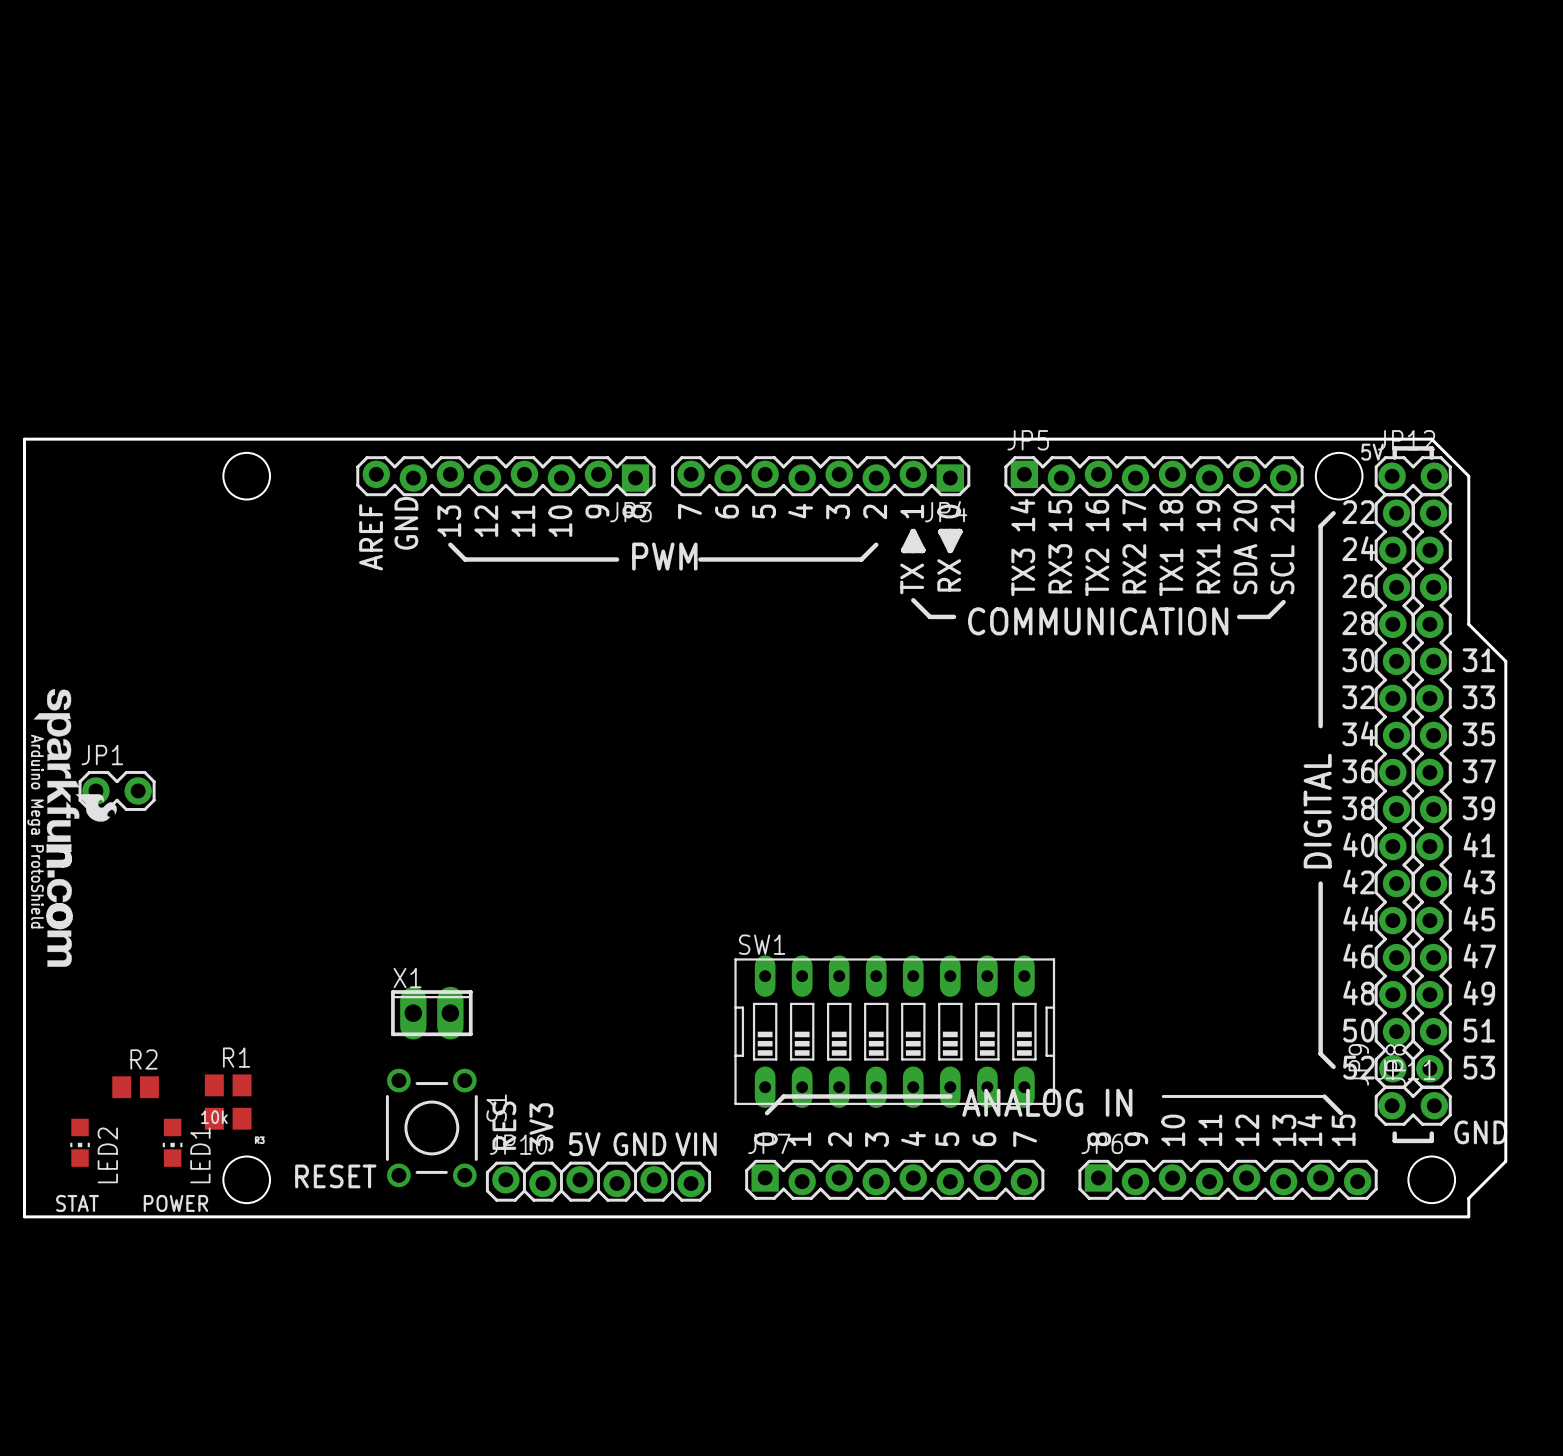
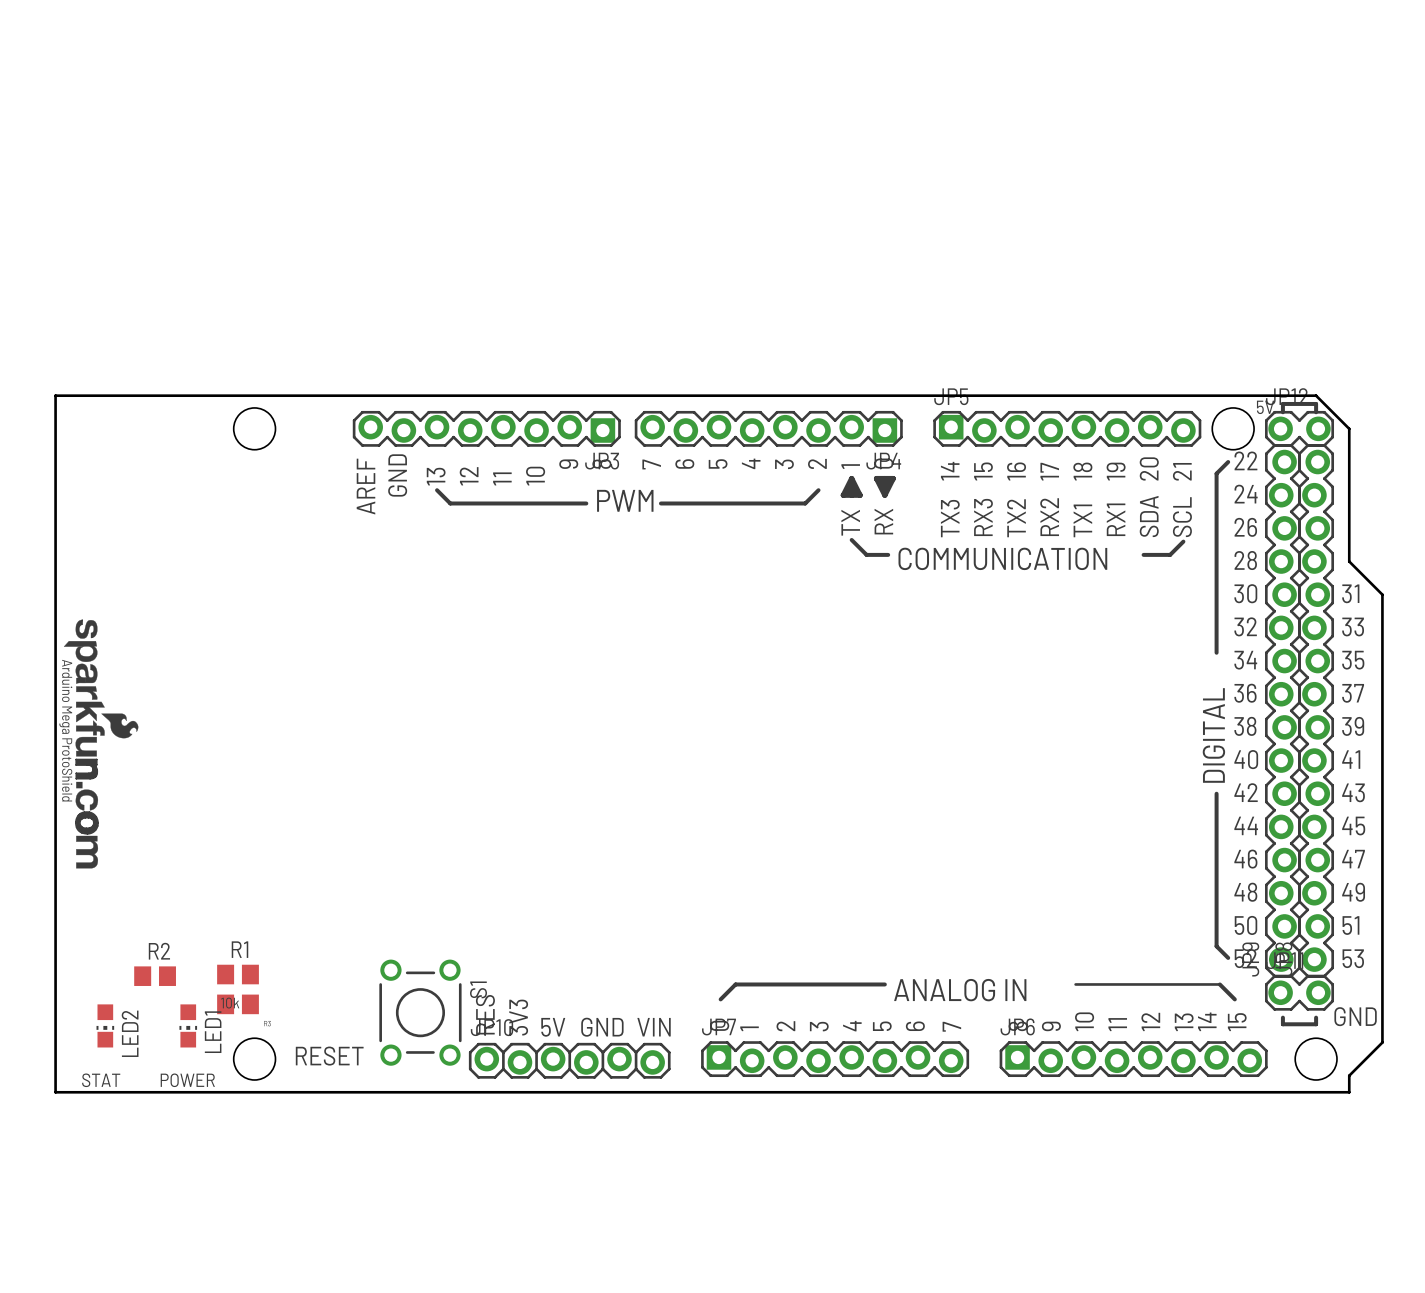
JP1: (117, 790) -> none
X1: (431, 1013) -> none
SW1: (894, 1031) -> none

